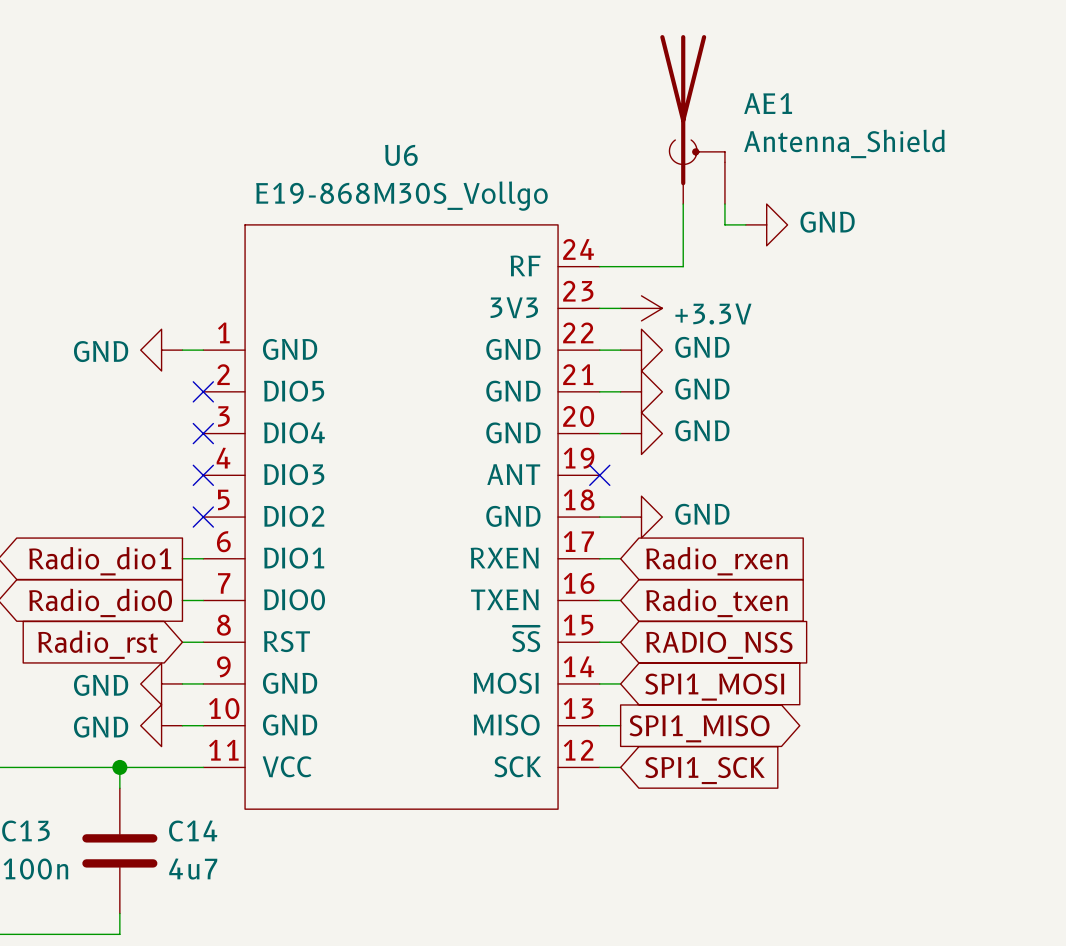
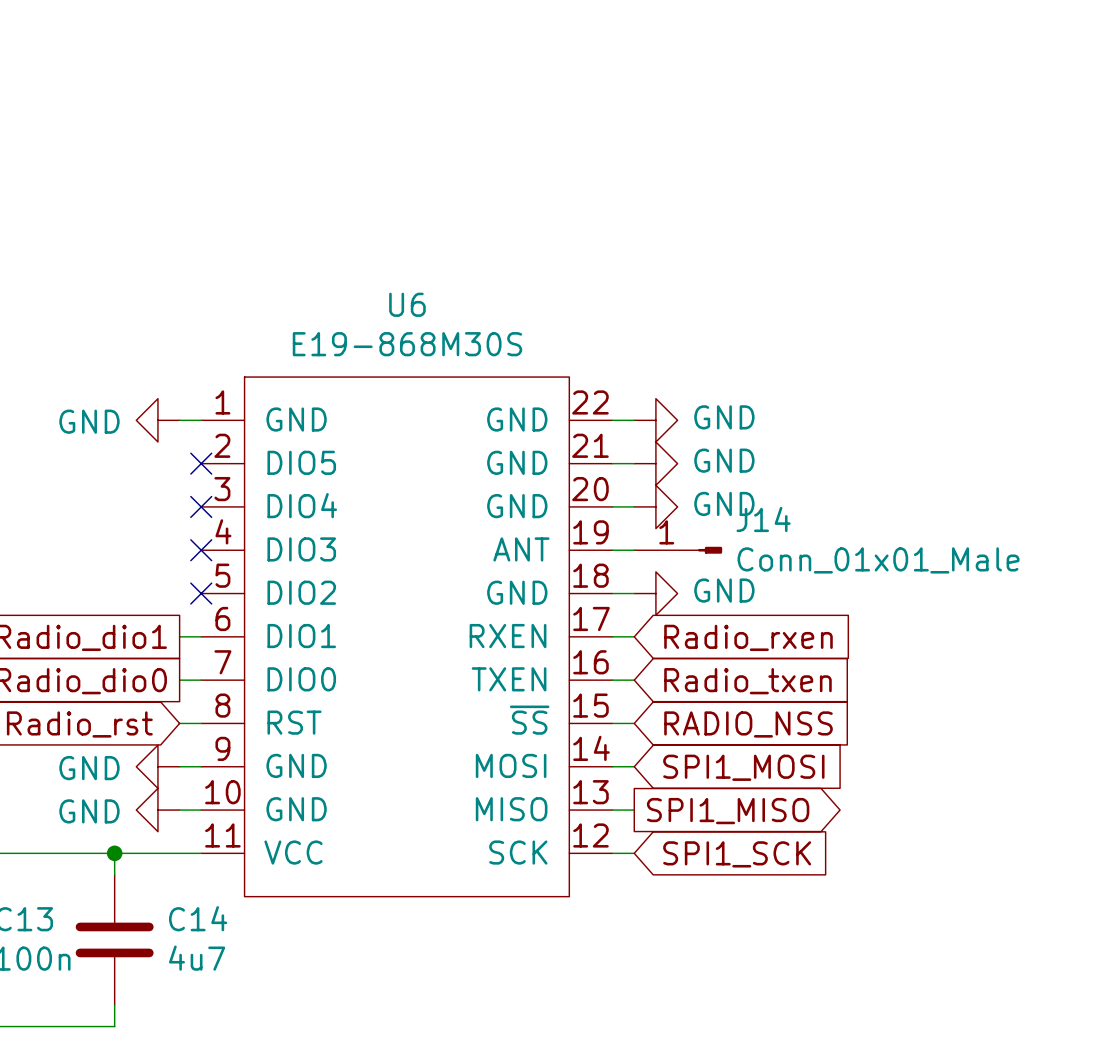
AE1: Antenna_Shield (692, 119) -> none
U6 name position: U6 (401, 155) -> U6 (407, 304)
U6 value: E19-868M30S_Vollgo (401, 196) -> E19-868M30S (407, 344)
wire: (683, 204) (683, 266) (599, 266) -> none
wire: (724, 204) (724, 224) (745, 224) -> none
U6 symbol: [203, 224, 600, 810] -> [201, 377, 613, 897]
power symbol: GND (766, 224) -> none
wire: (599, 308) (620, 308) -> (612, 550) (634, 550)
power symbol: +3.3V (641, 308) -> none
no-connect mark: (599, 475) -> none
J14: none -> Conn_01x01_Male (678, 550)

